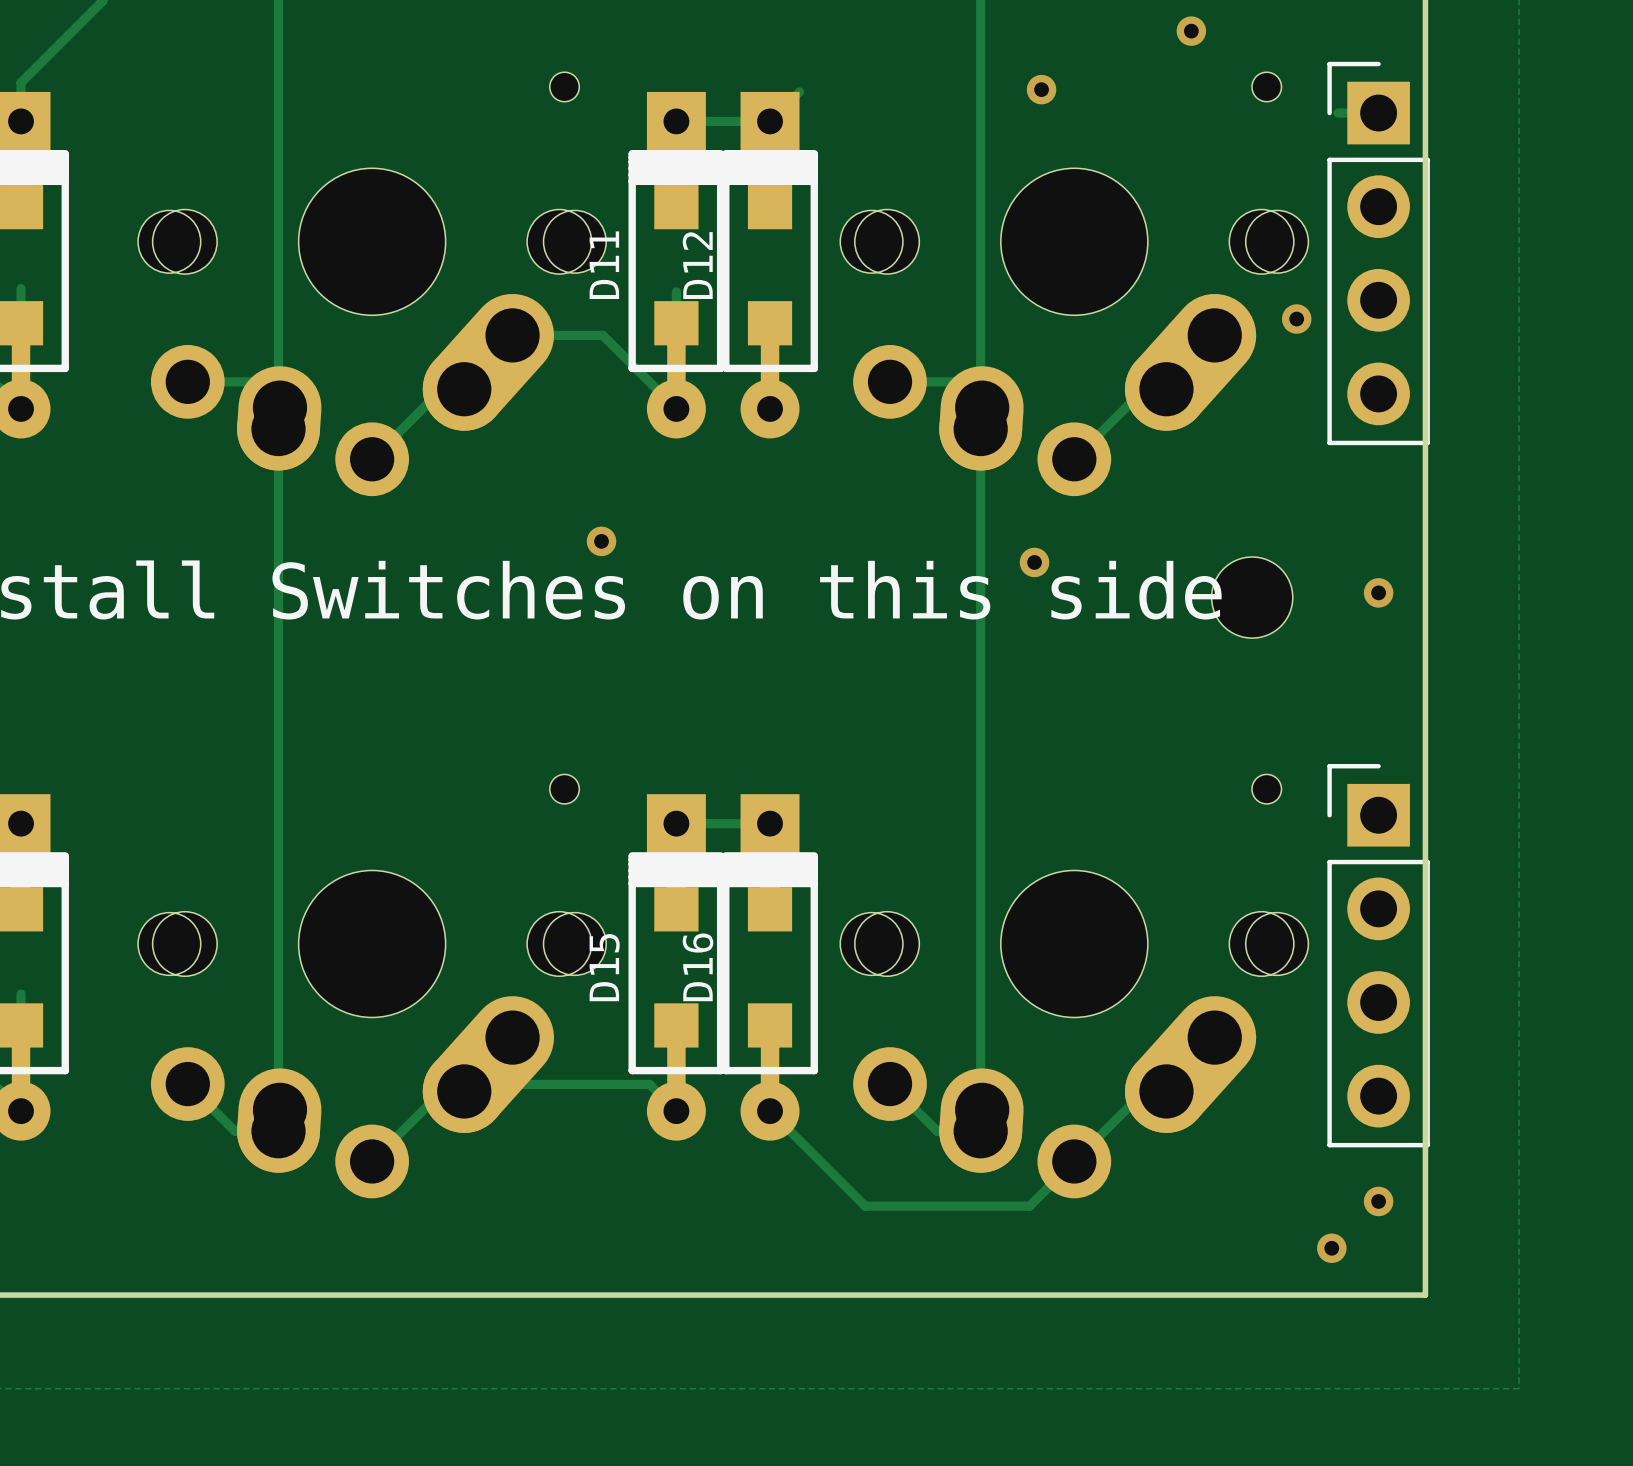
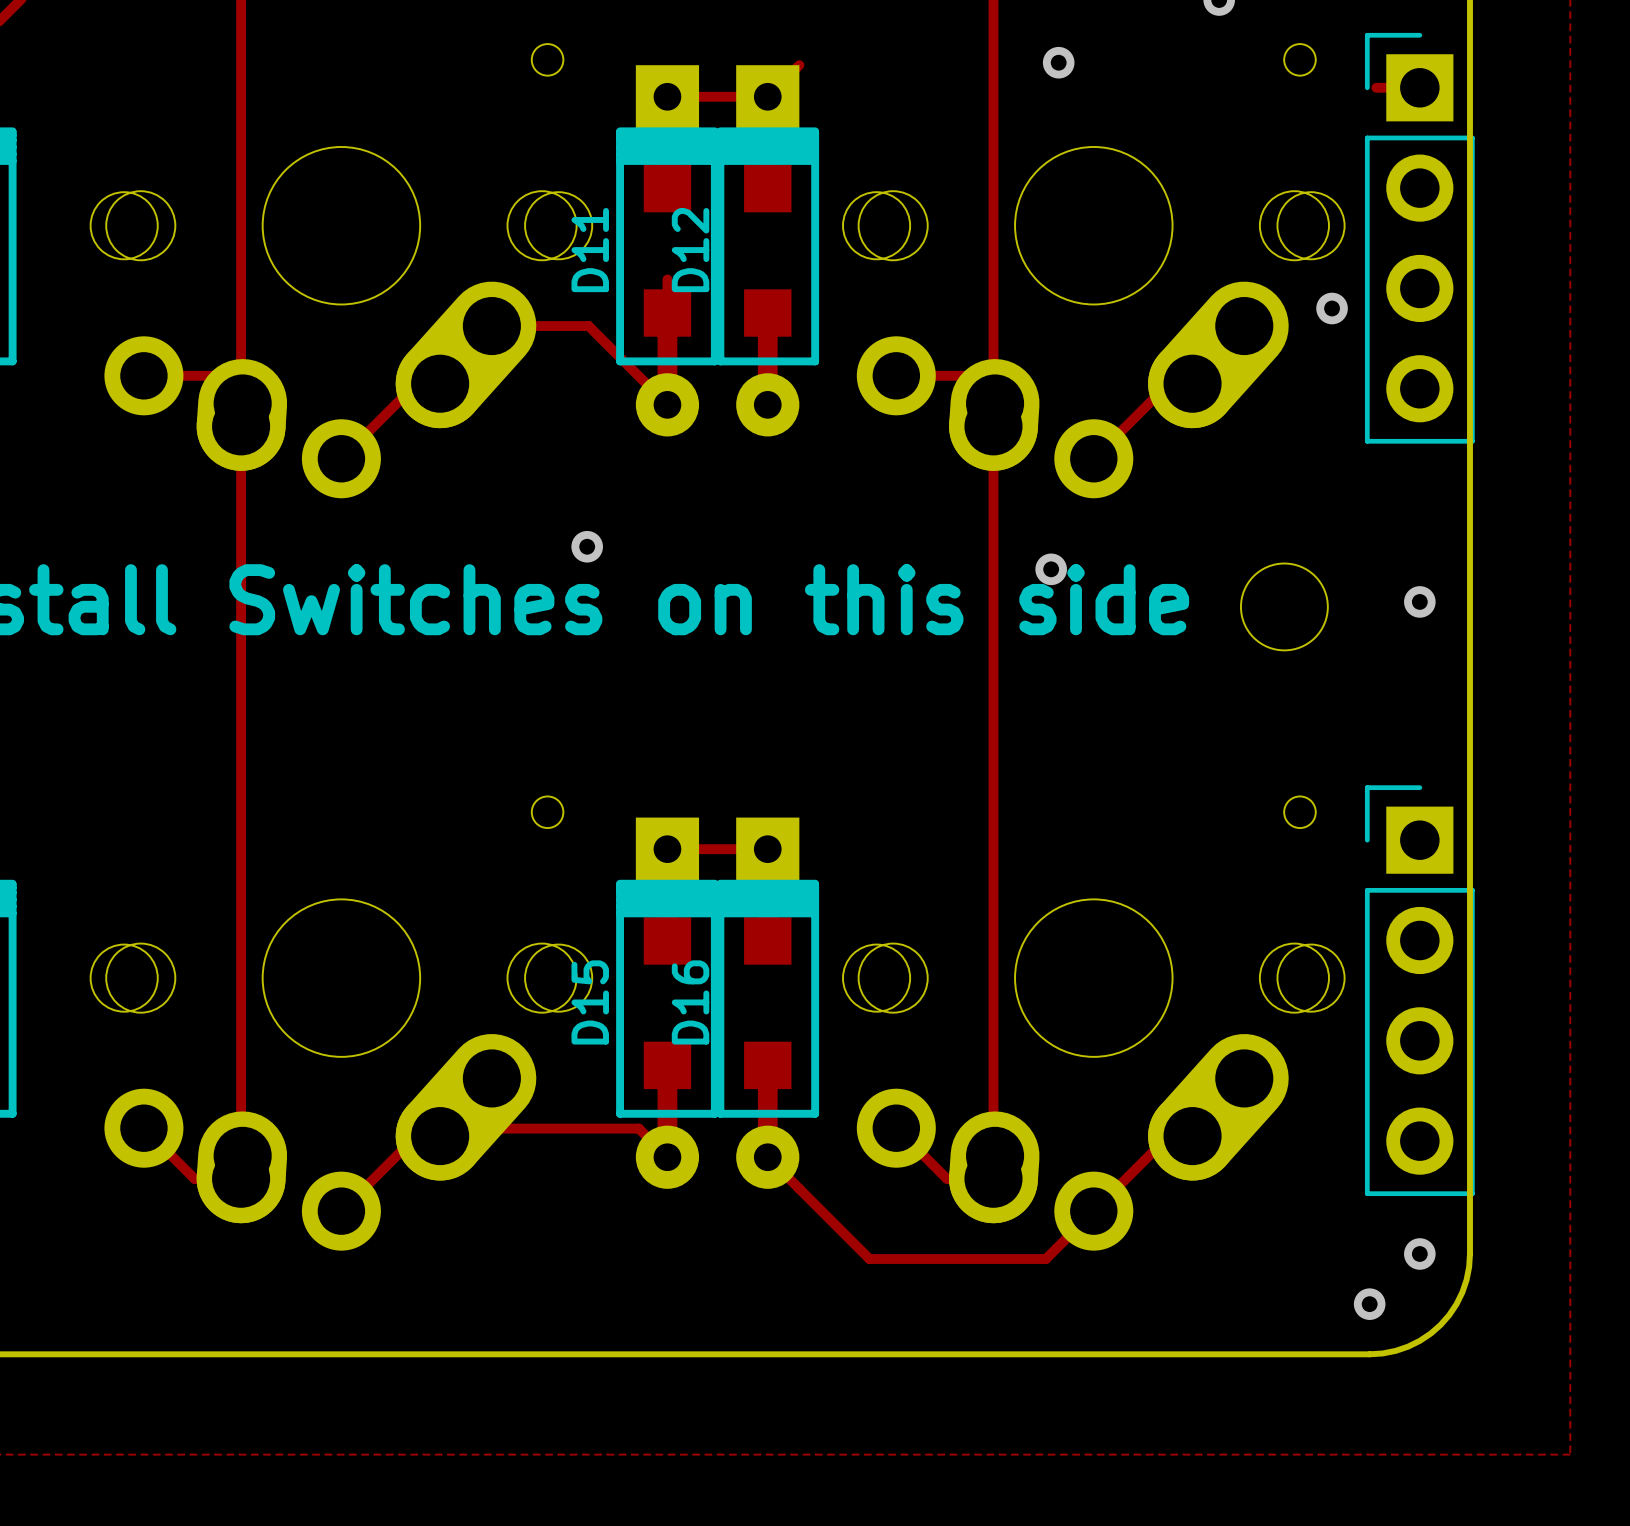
board edge: (1425, 1201) (1425, 1295) (1331, 1295) -> (1469, 1254) (1469, 1267) (1462, 1292) (1456, 1304) (1440, 1324) (1419, 1340) (1408, 1346) (1382, 1353) (1369, 1354)

